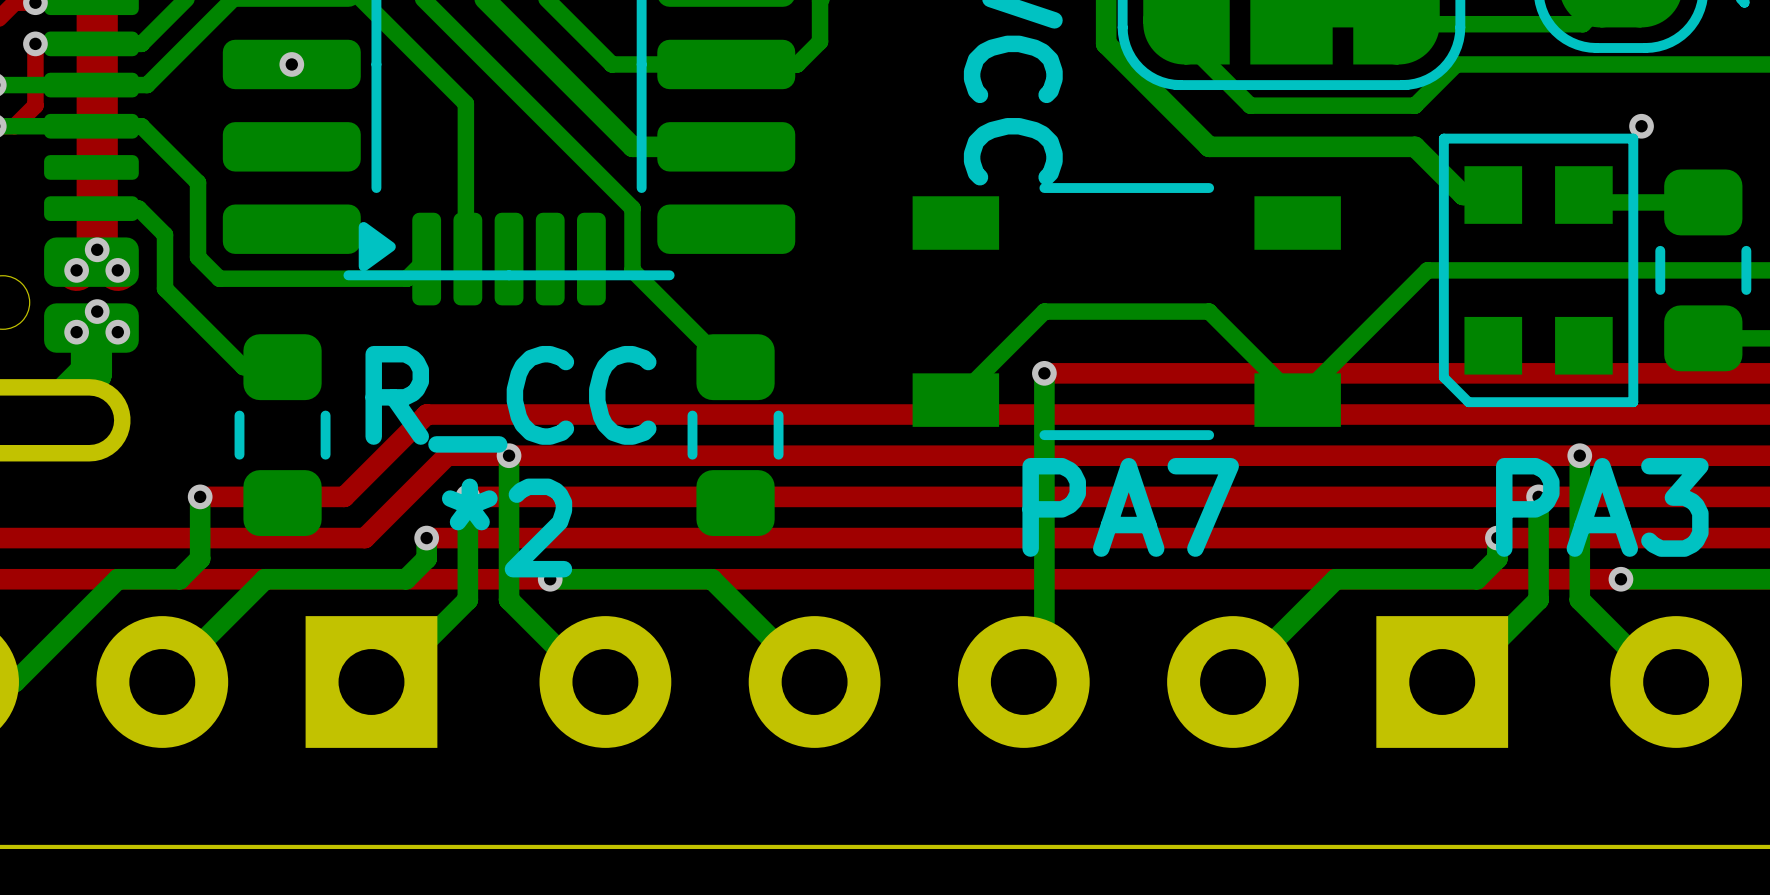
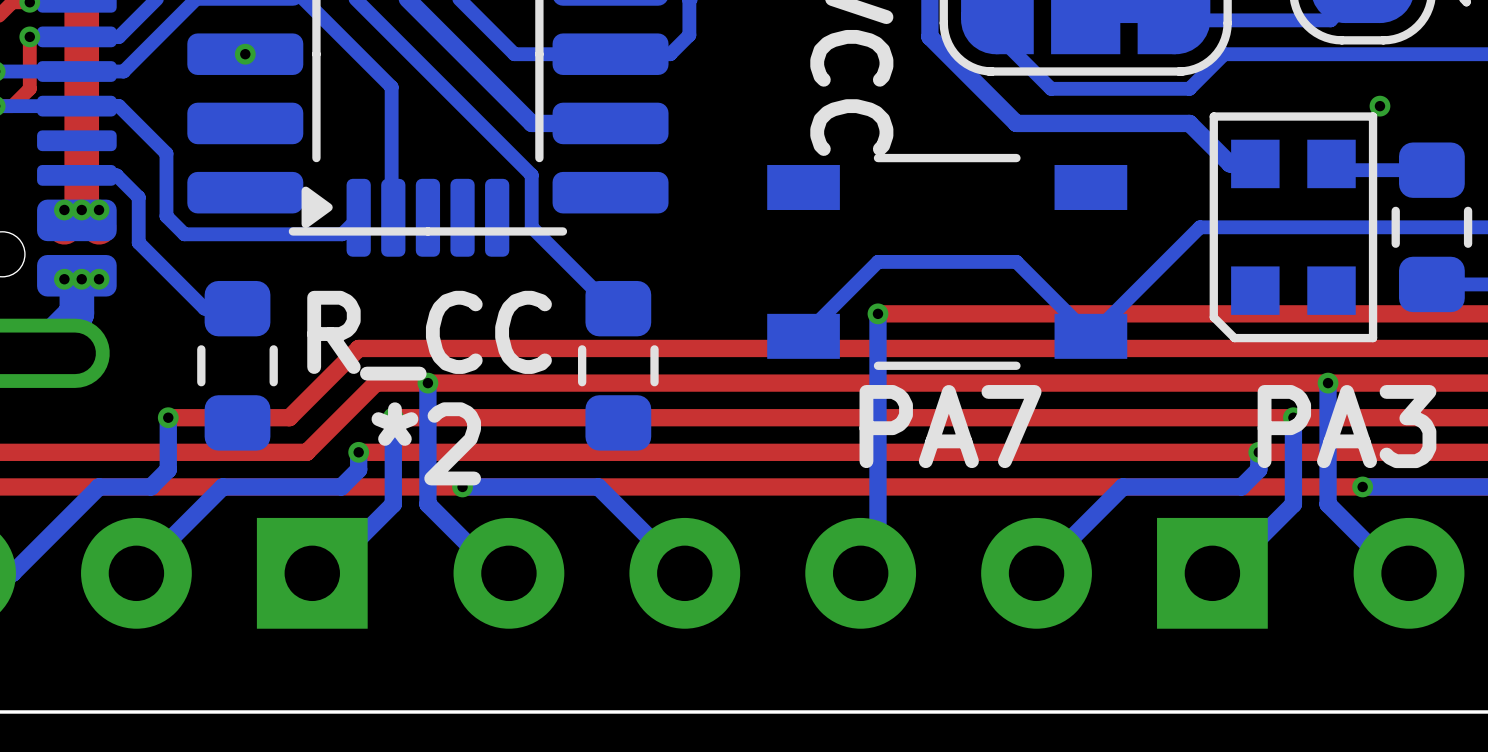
via position: (76, 270) -> (64, 209)
via position: (117, 270) -> (99, 209)
via position: (97, 311) -> (81, 279)

